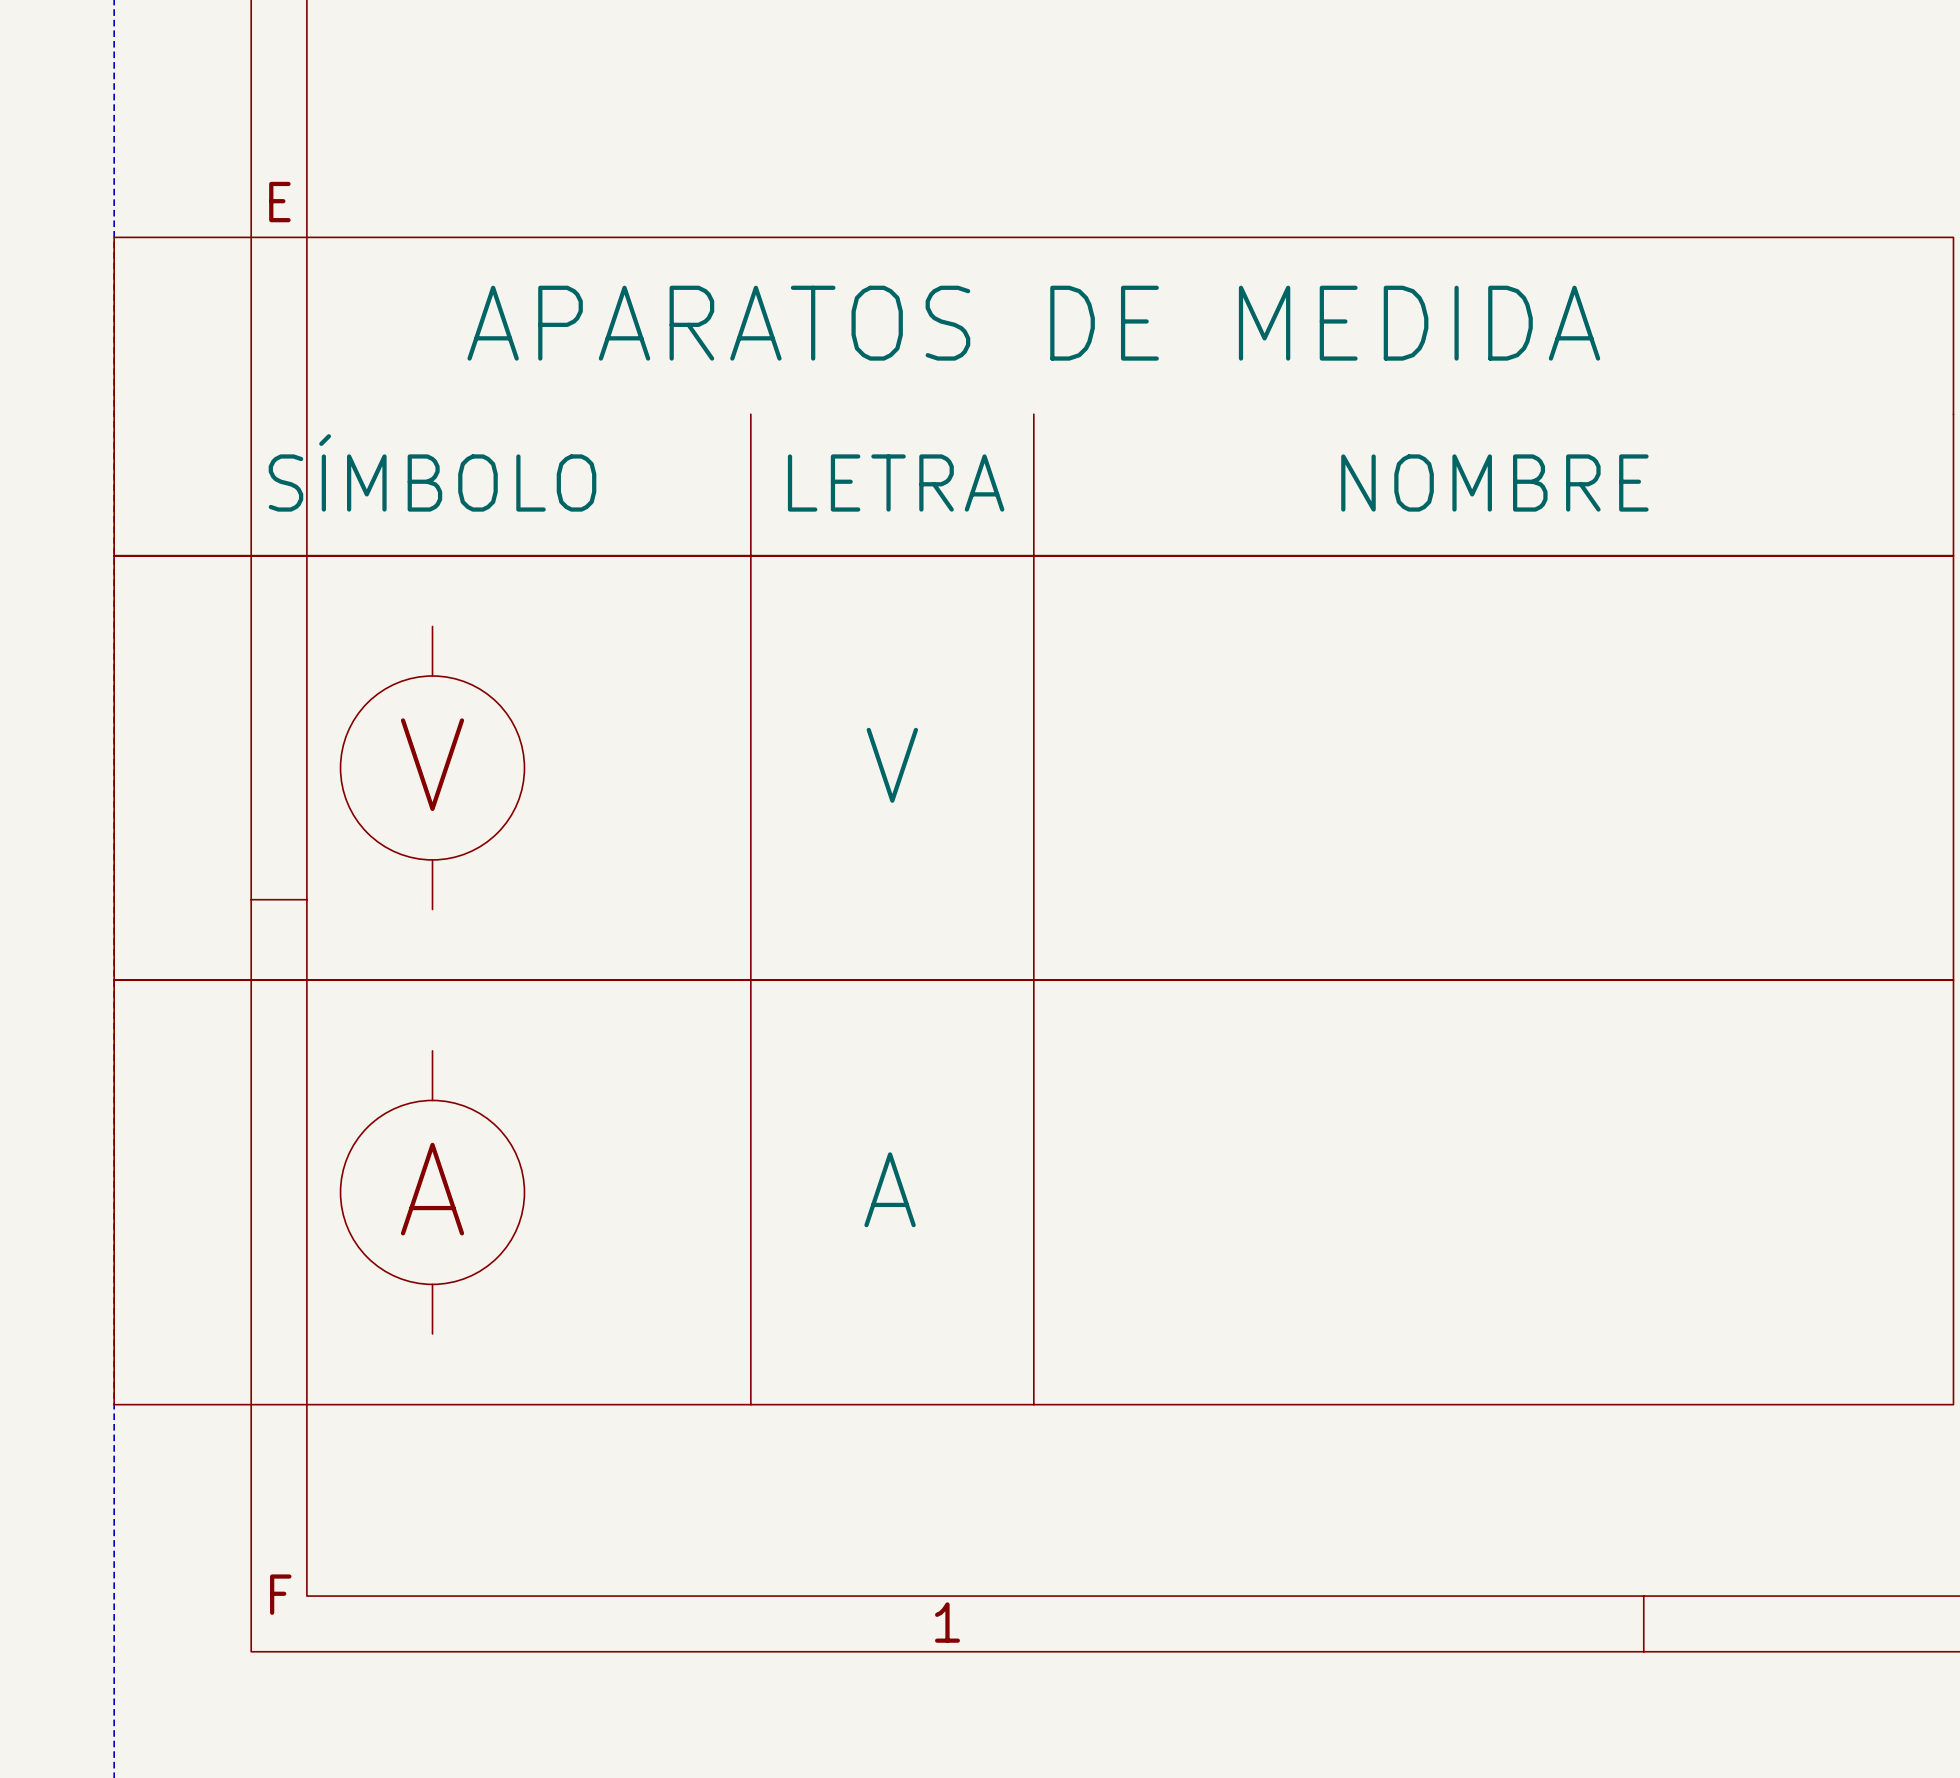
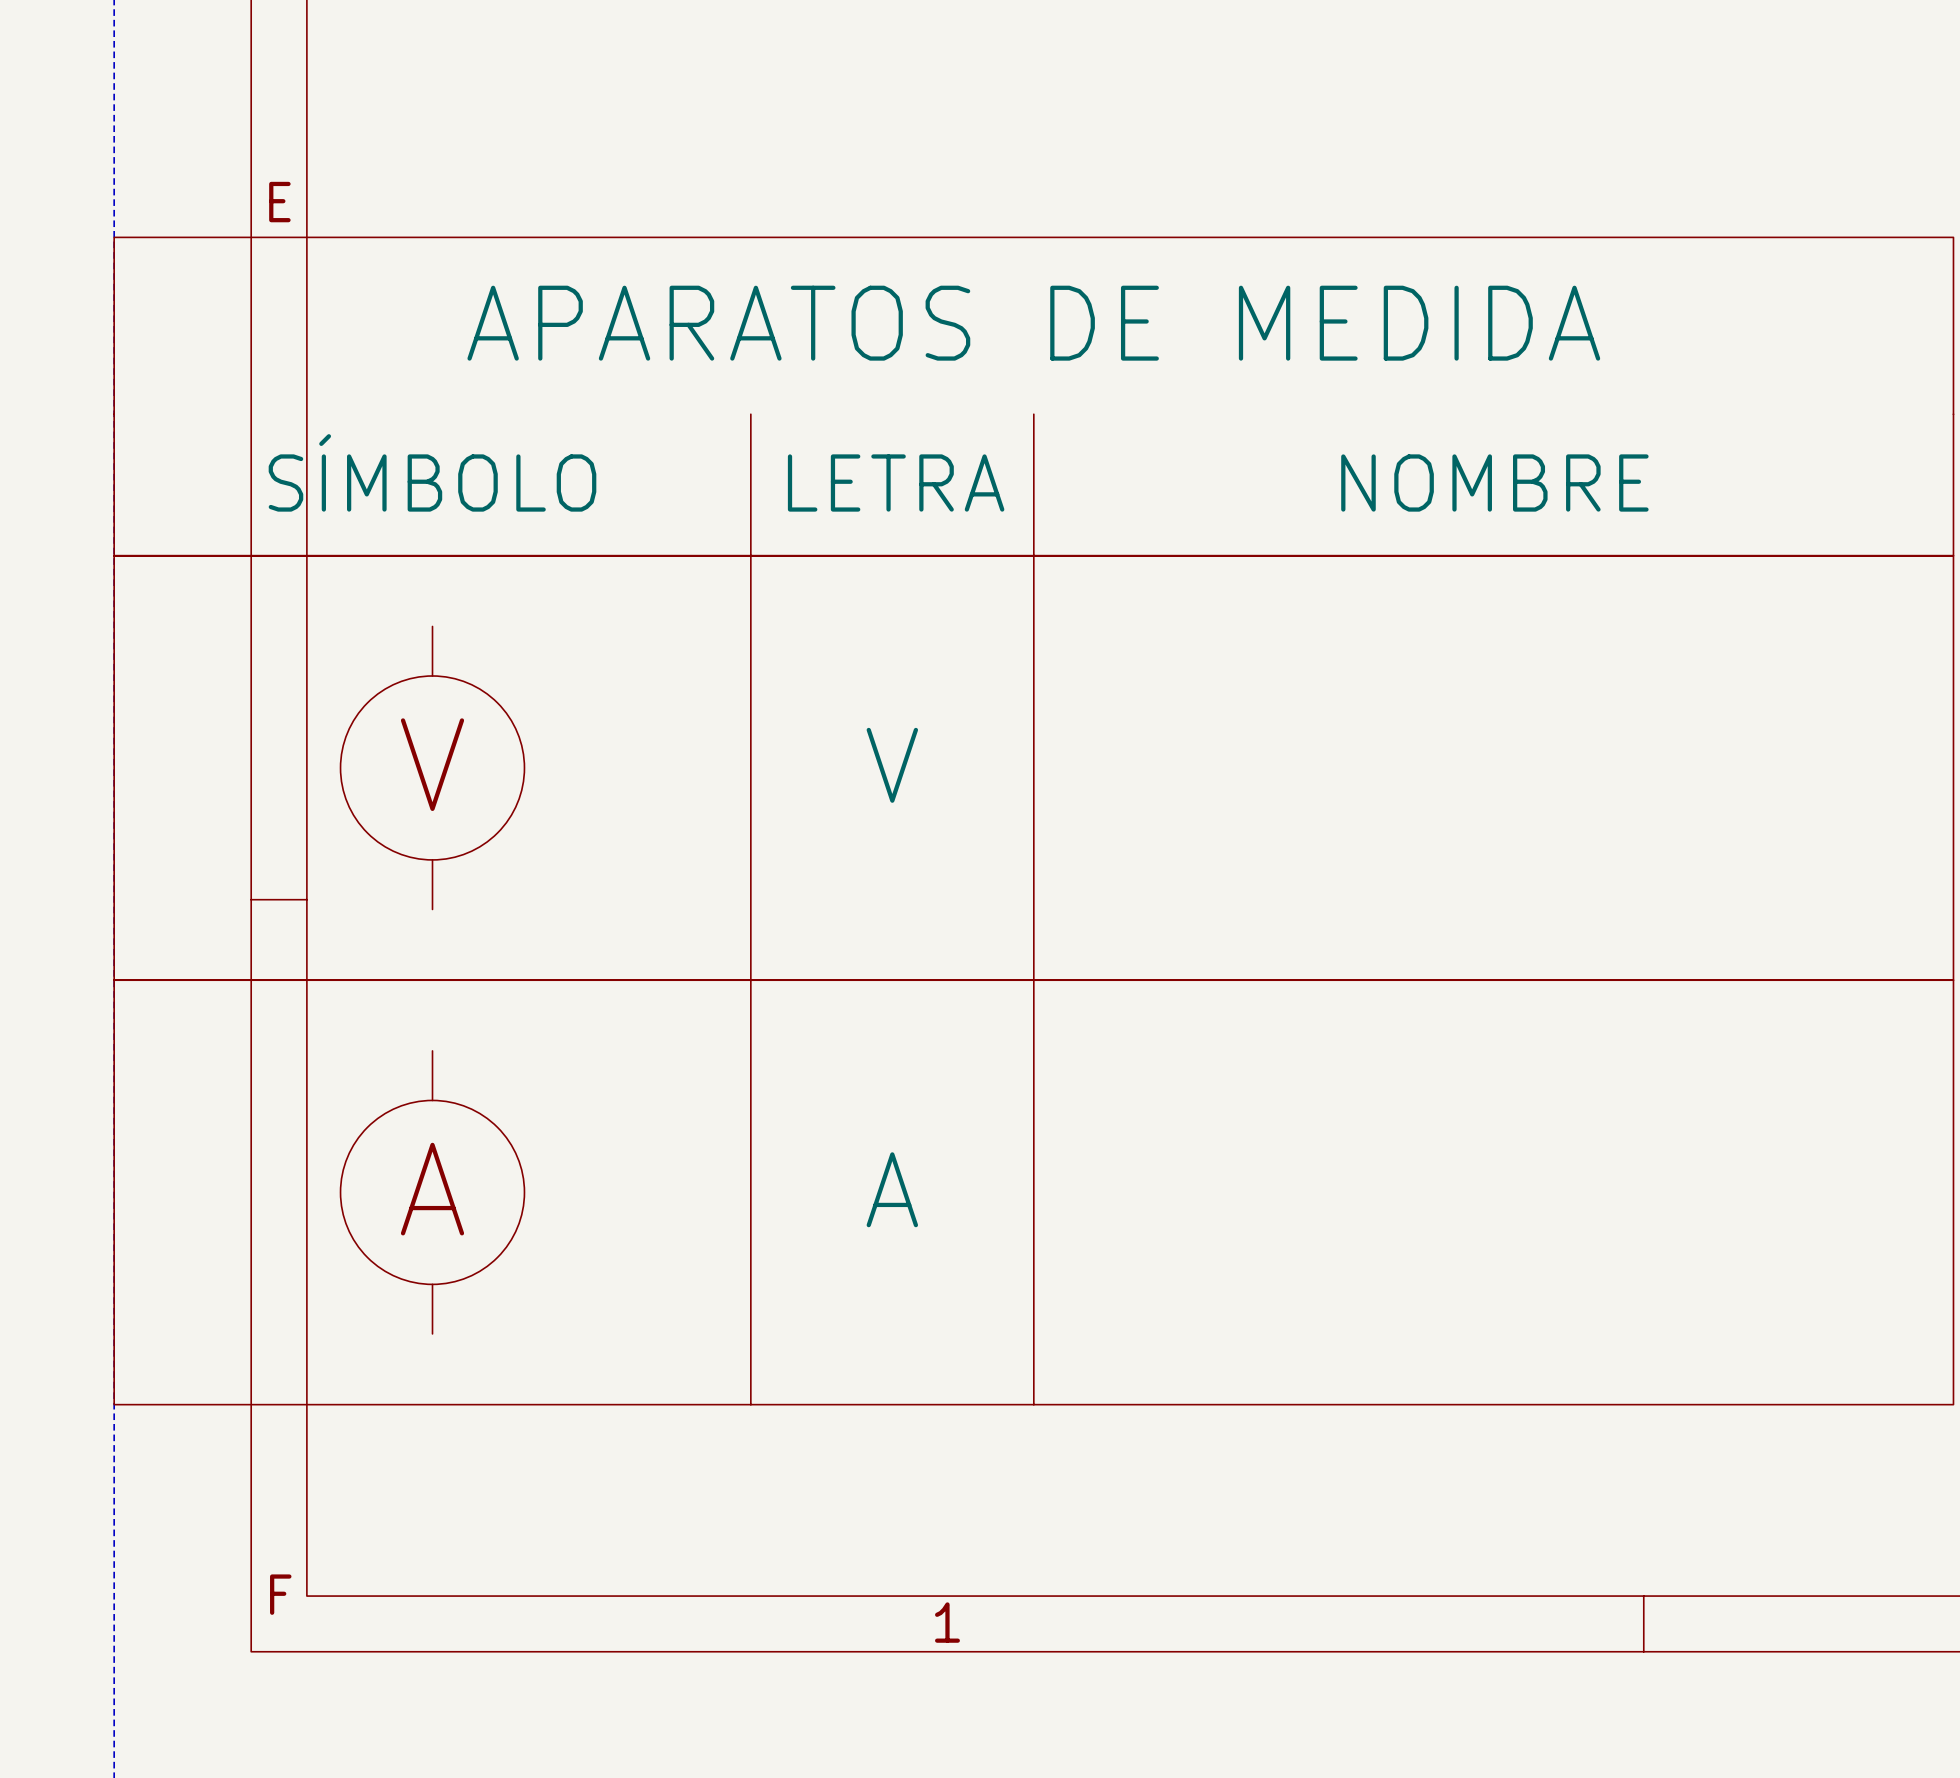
A name position: A (890, 1189) -> A (892, 1189)

